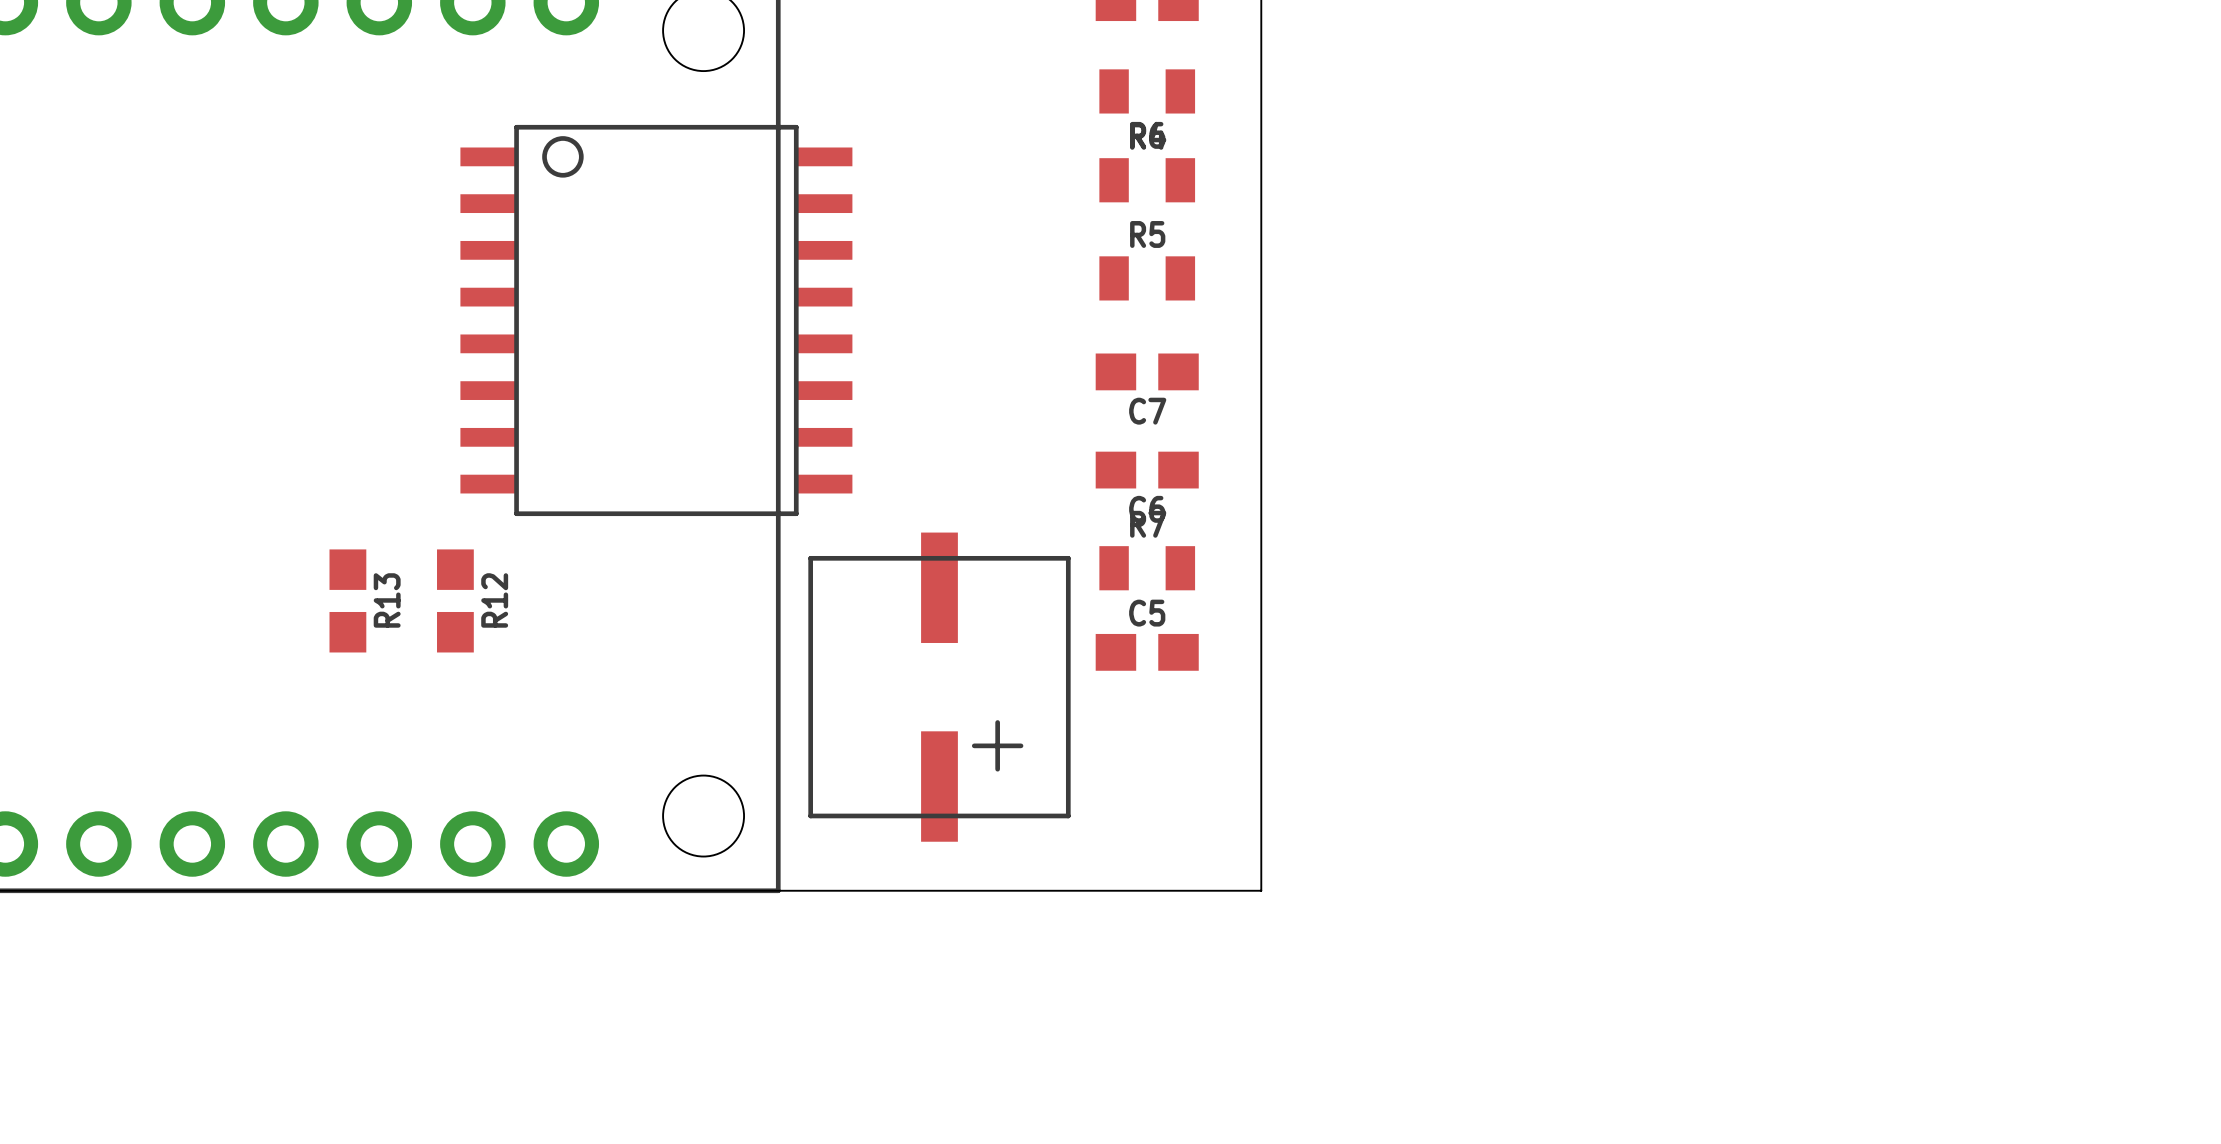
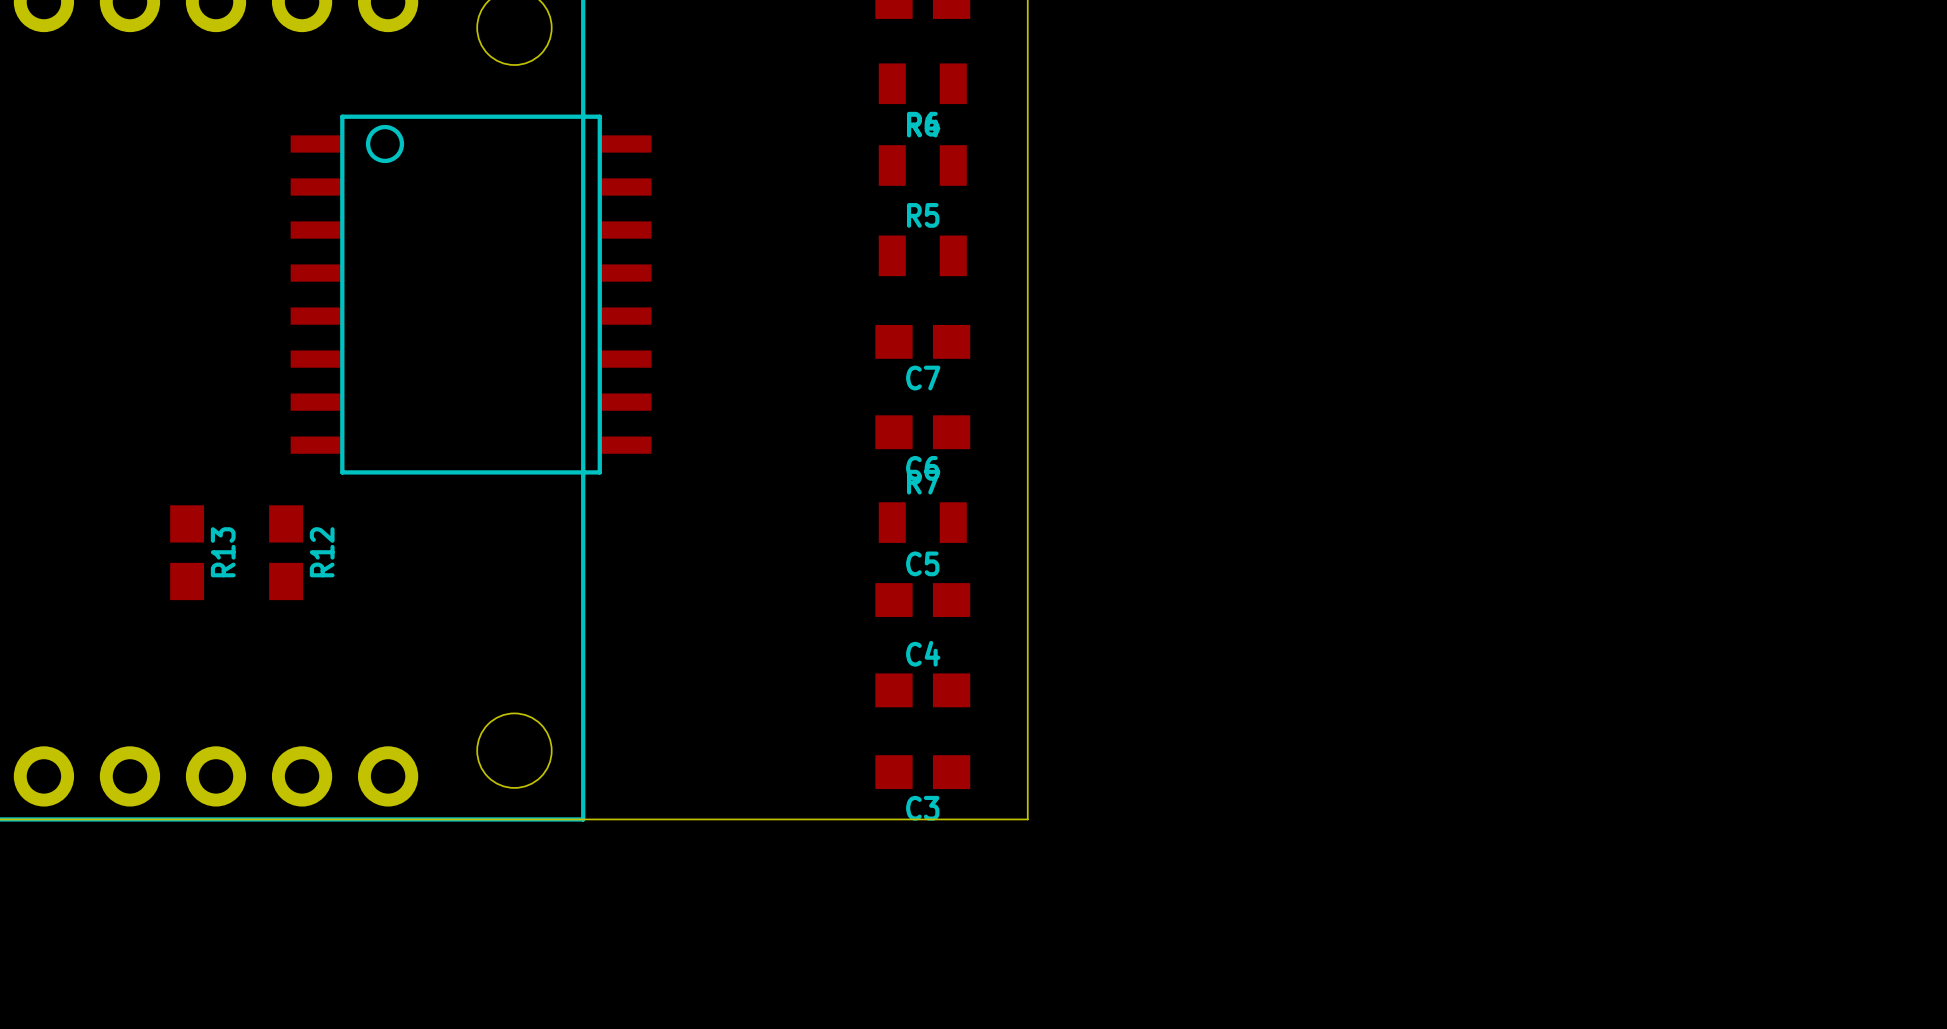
part: (939, 687) -> none
C4: none -> (922, 690)
C3: none -> (922, 772)

